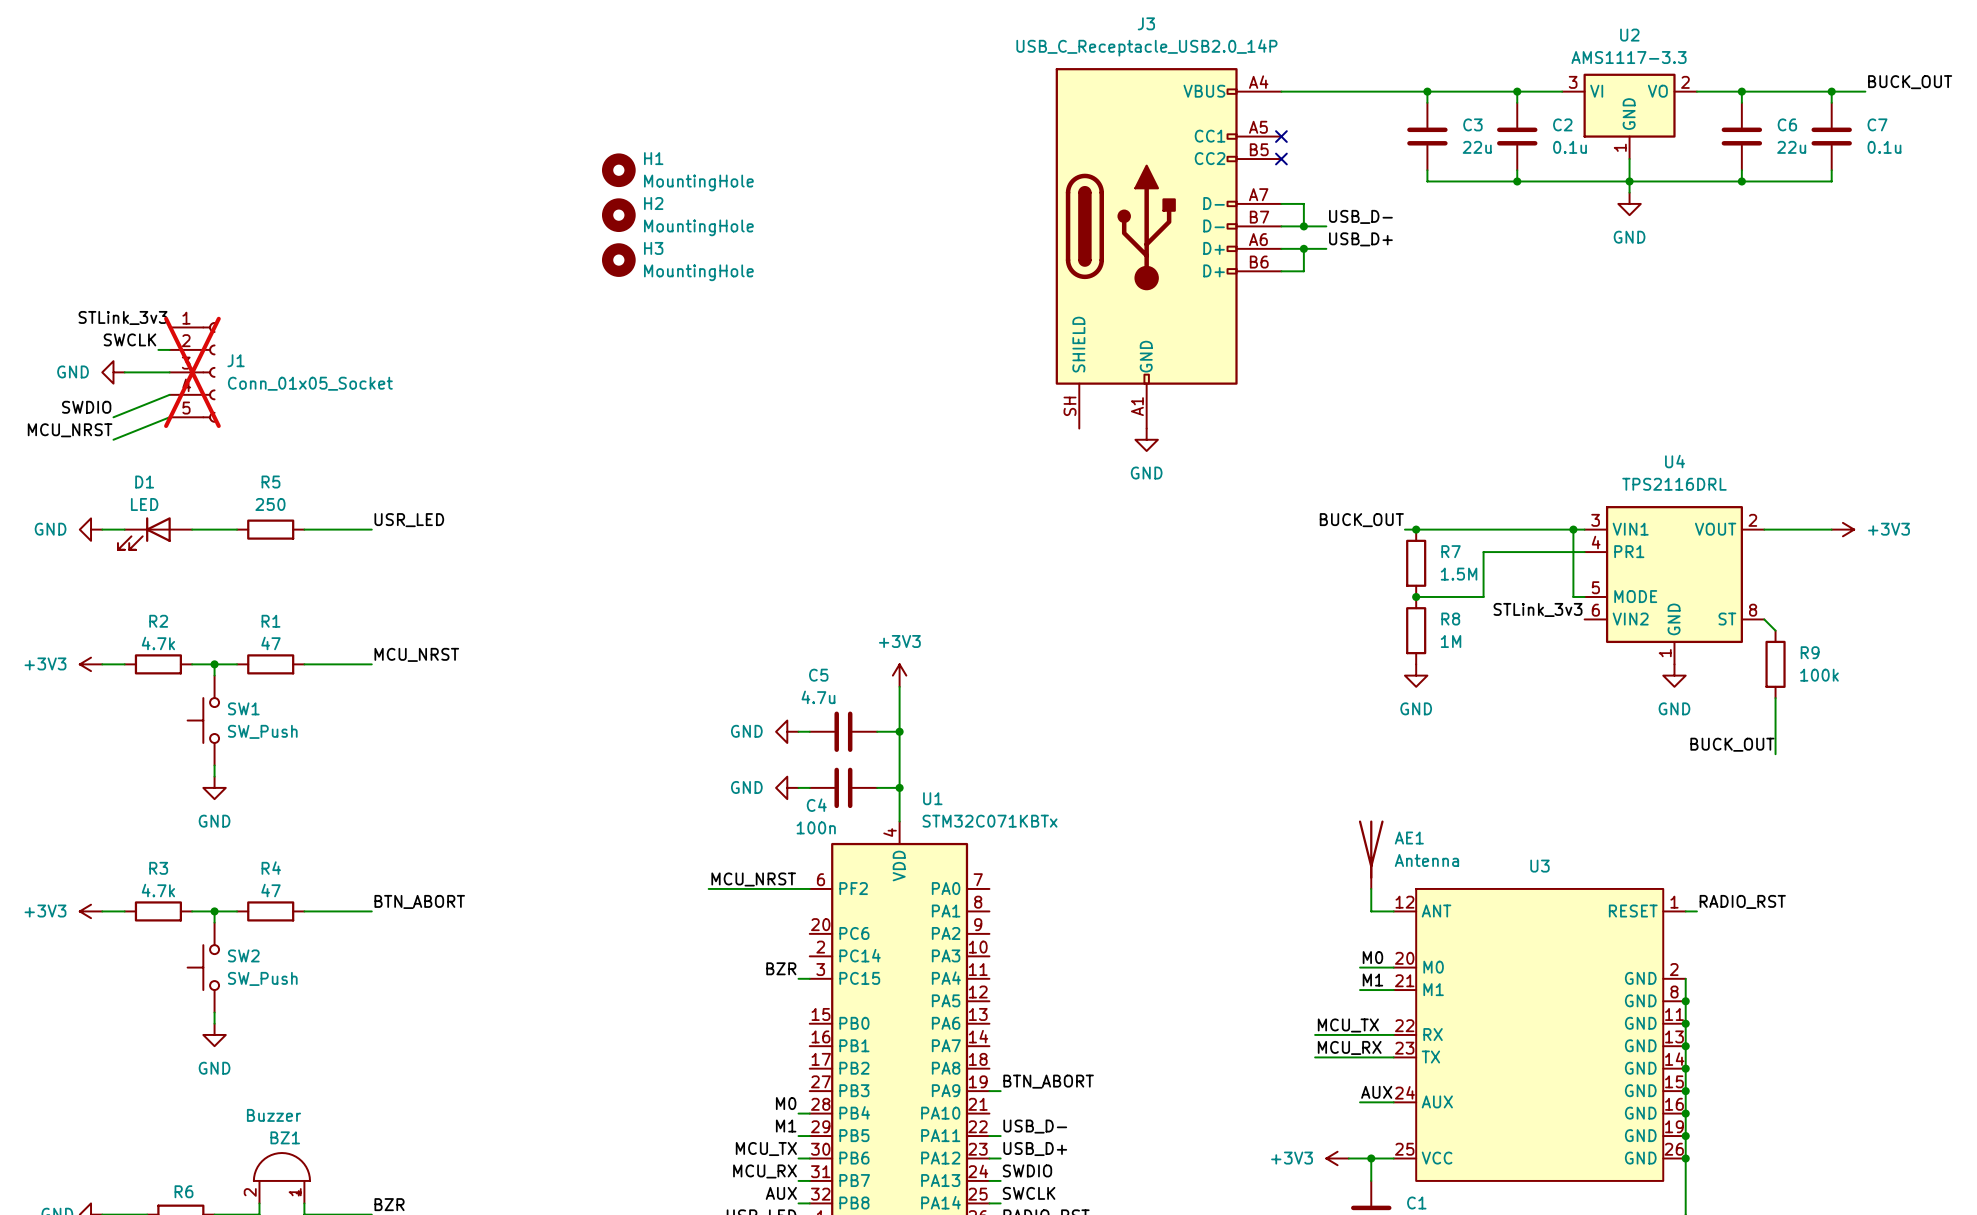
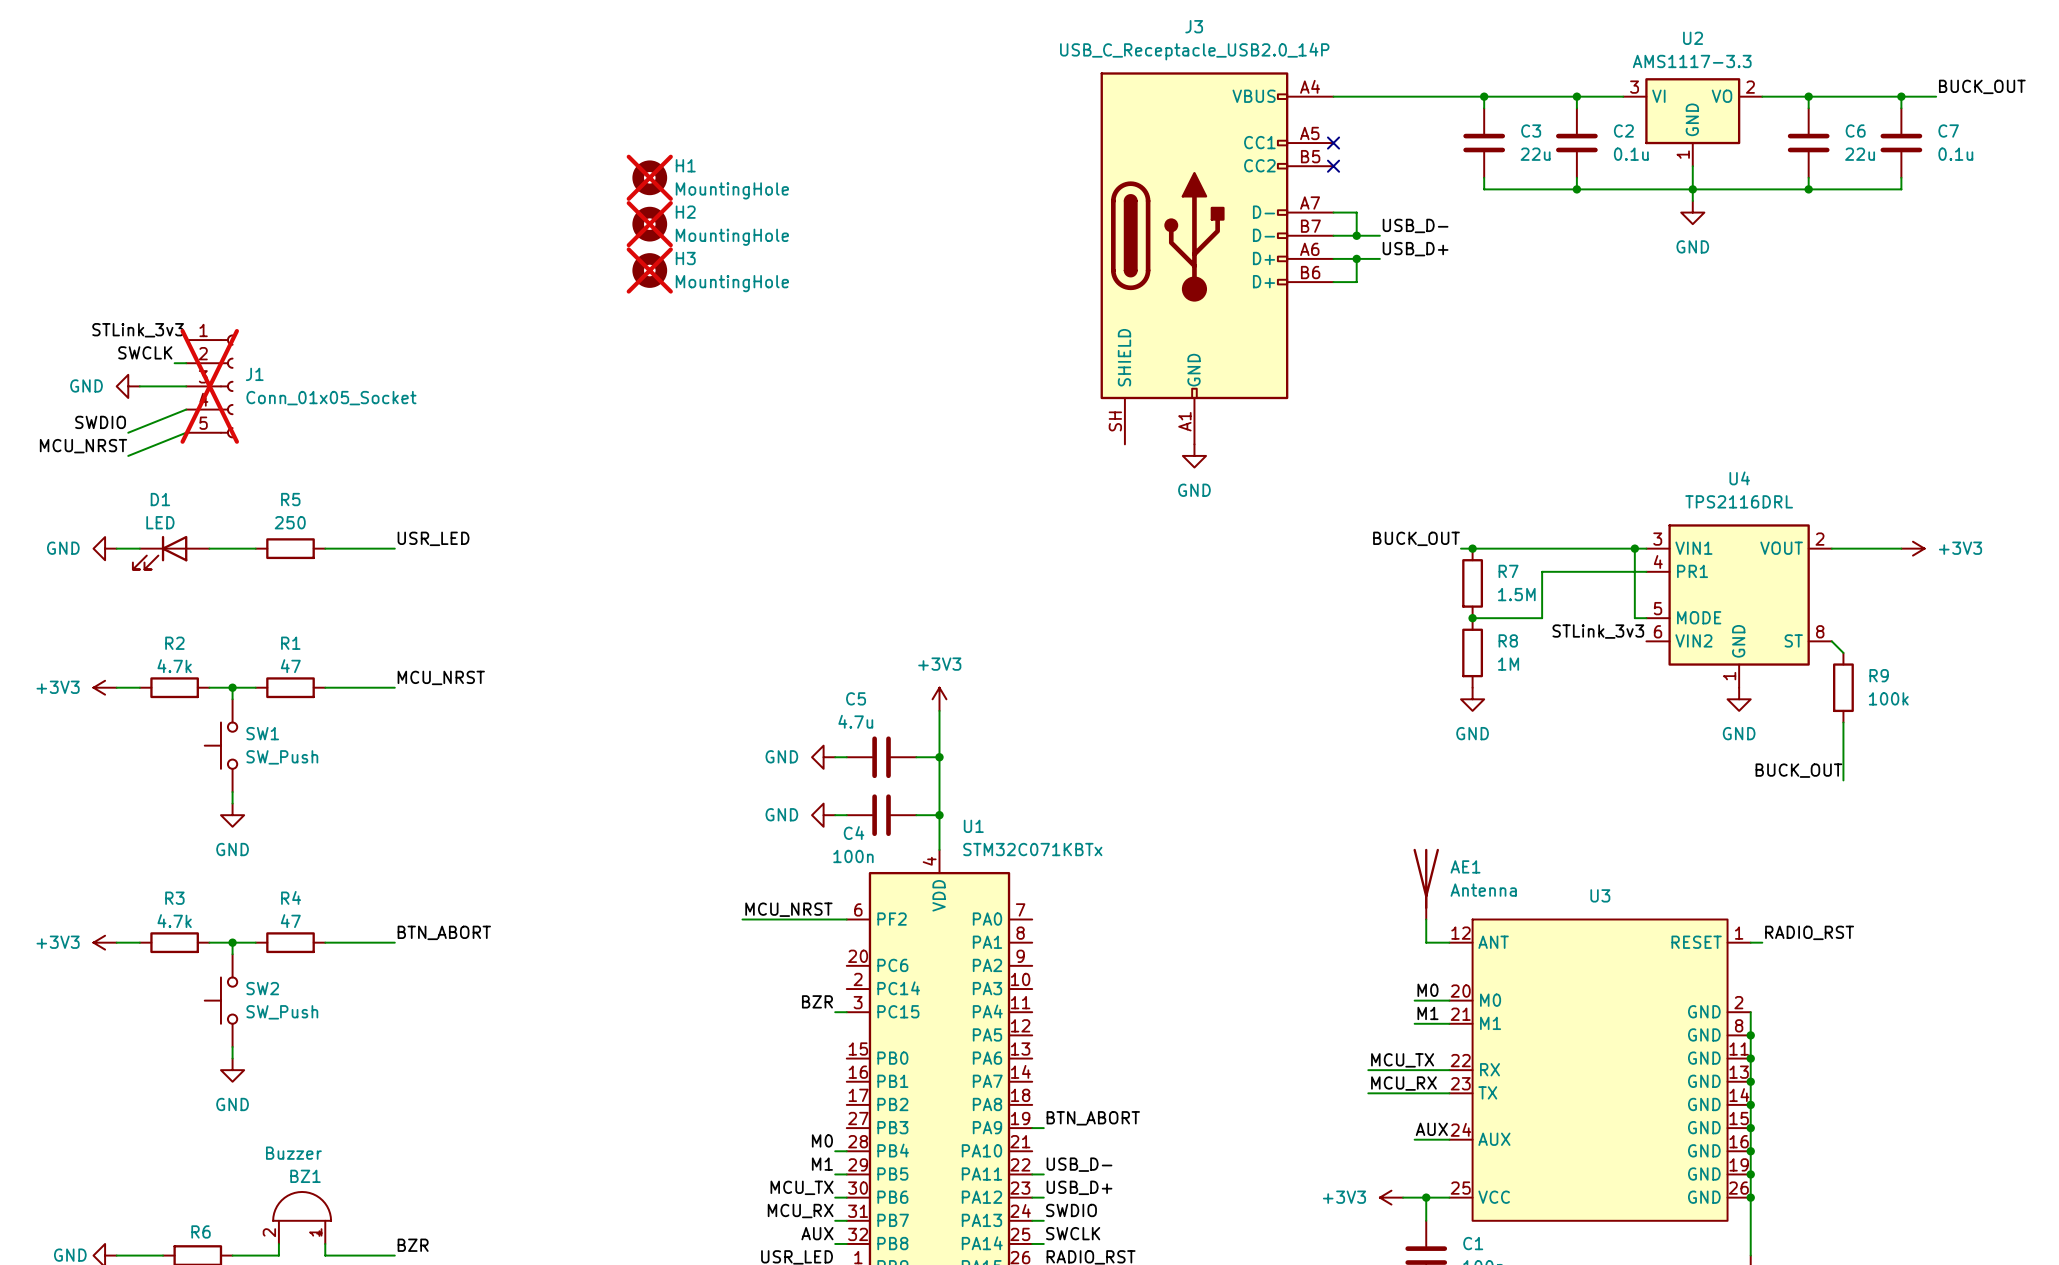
H1 do-not-place cross: none -> (649, 177)
H2 do-not-place cross: none -> (649, 224)
H3 do-not-place cross: none -> (649, 270)

